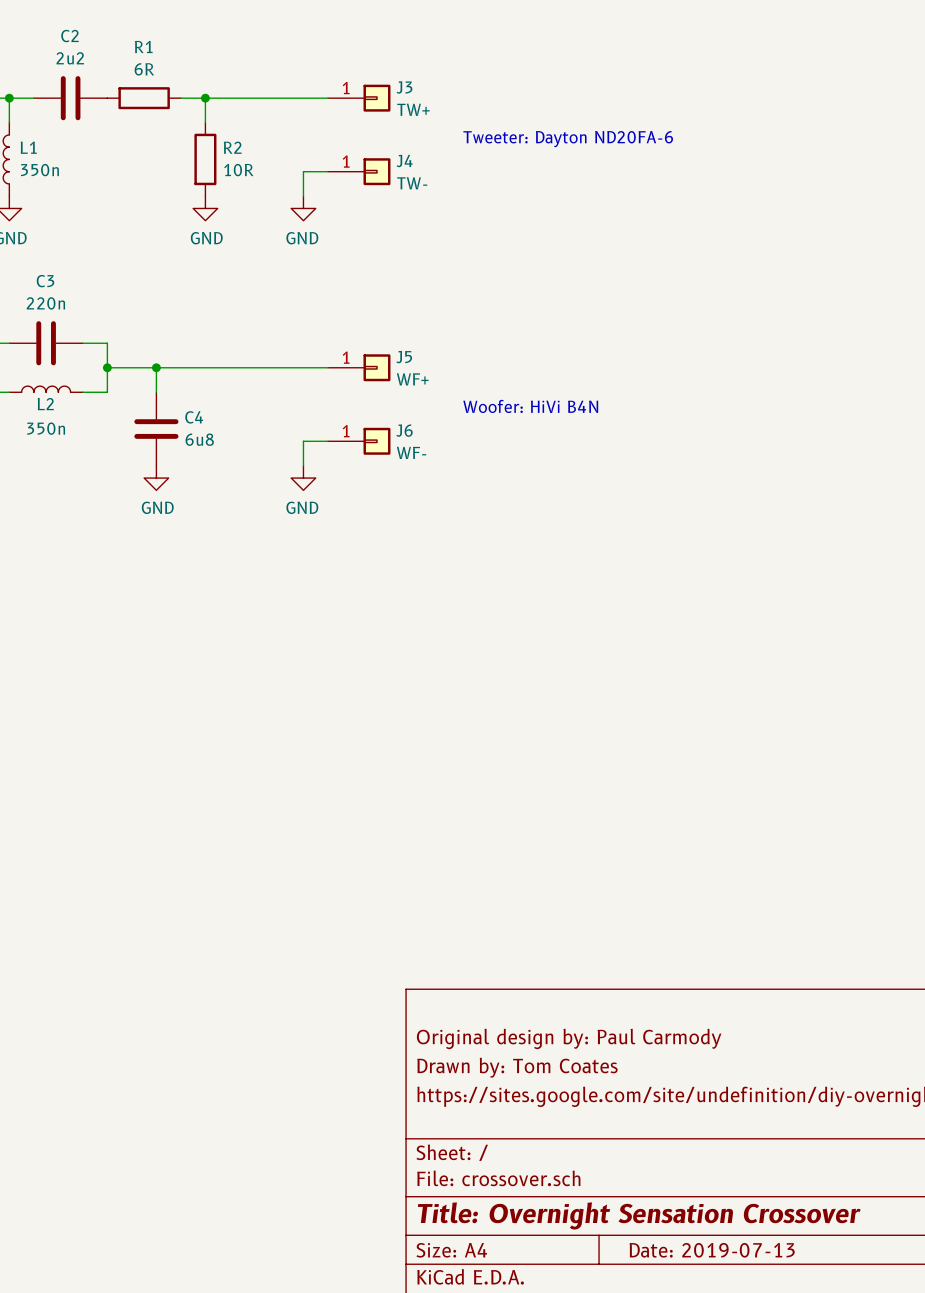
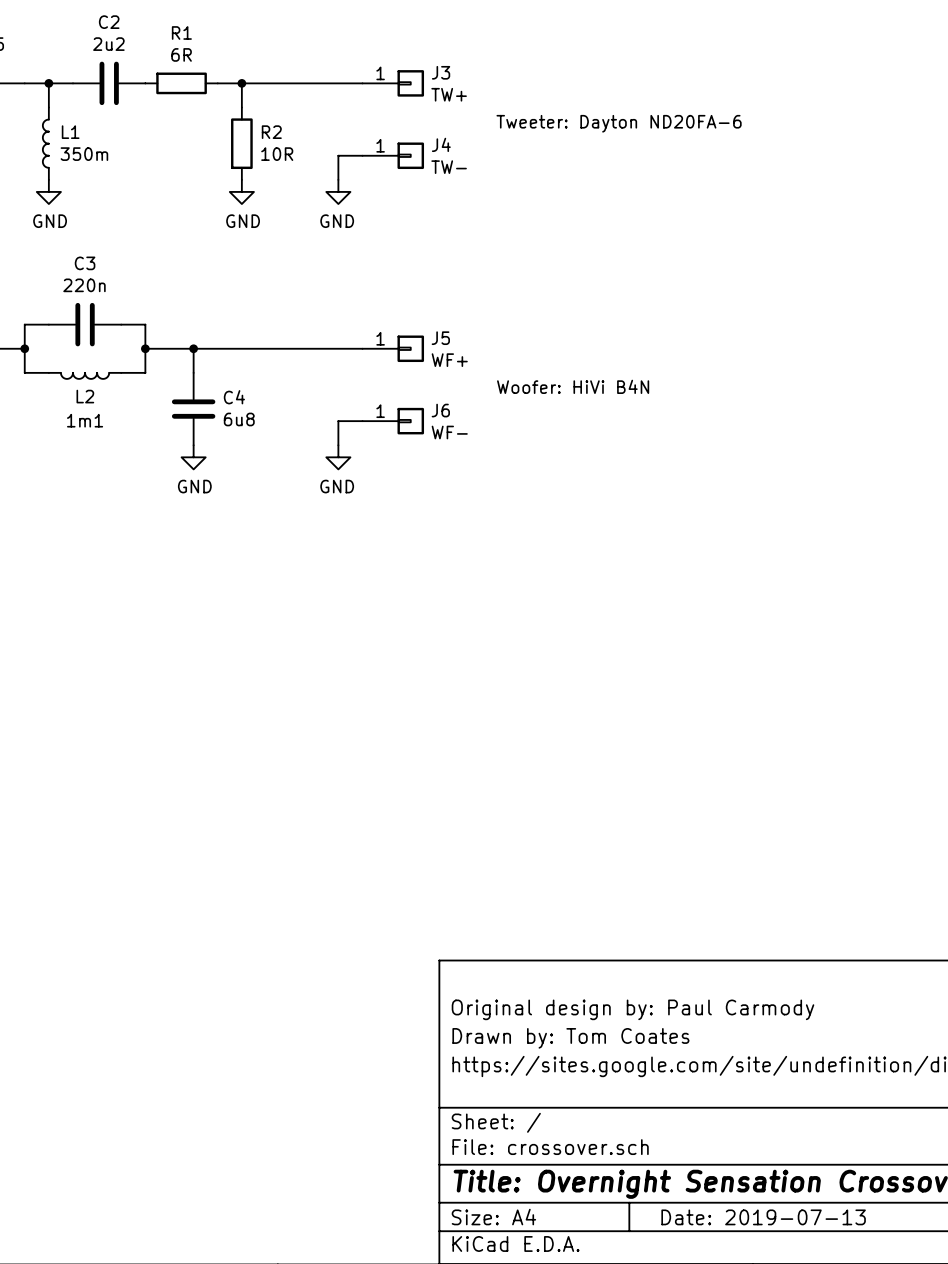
L1 value: 350n (39, 170) -> 350m (84, 154)
L2 rotation: 0° (46, 389) -> 180° (85, 375)
L2 value: 350n (46, 428) -> 1m1 (85, 420)

